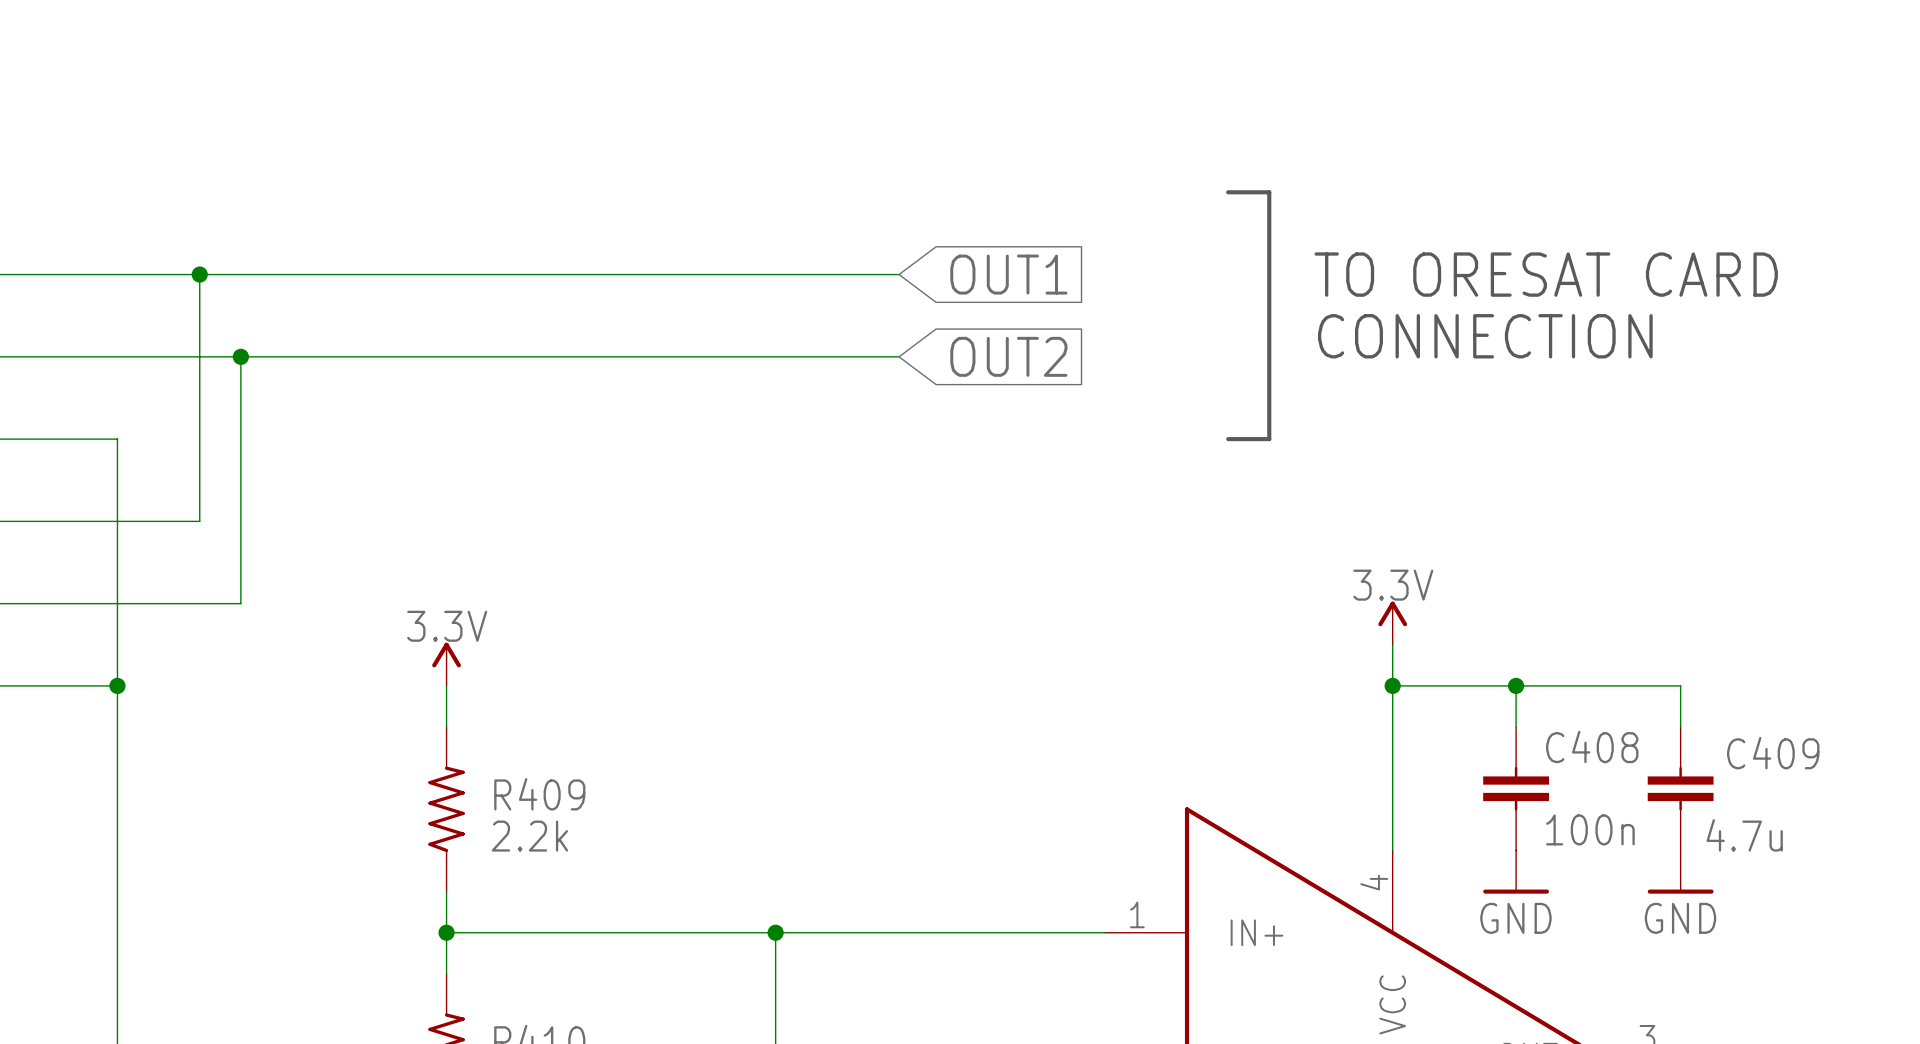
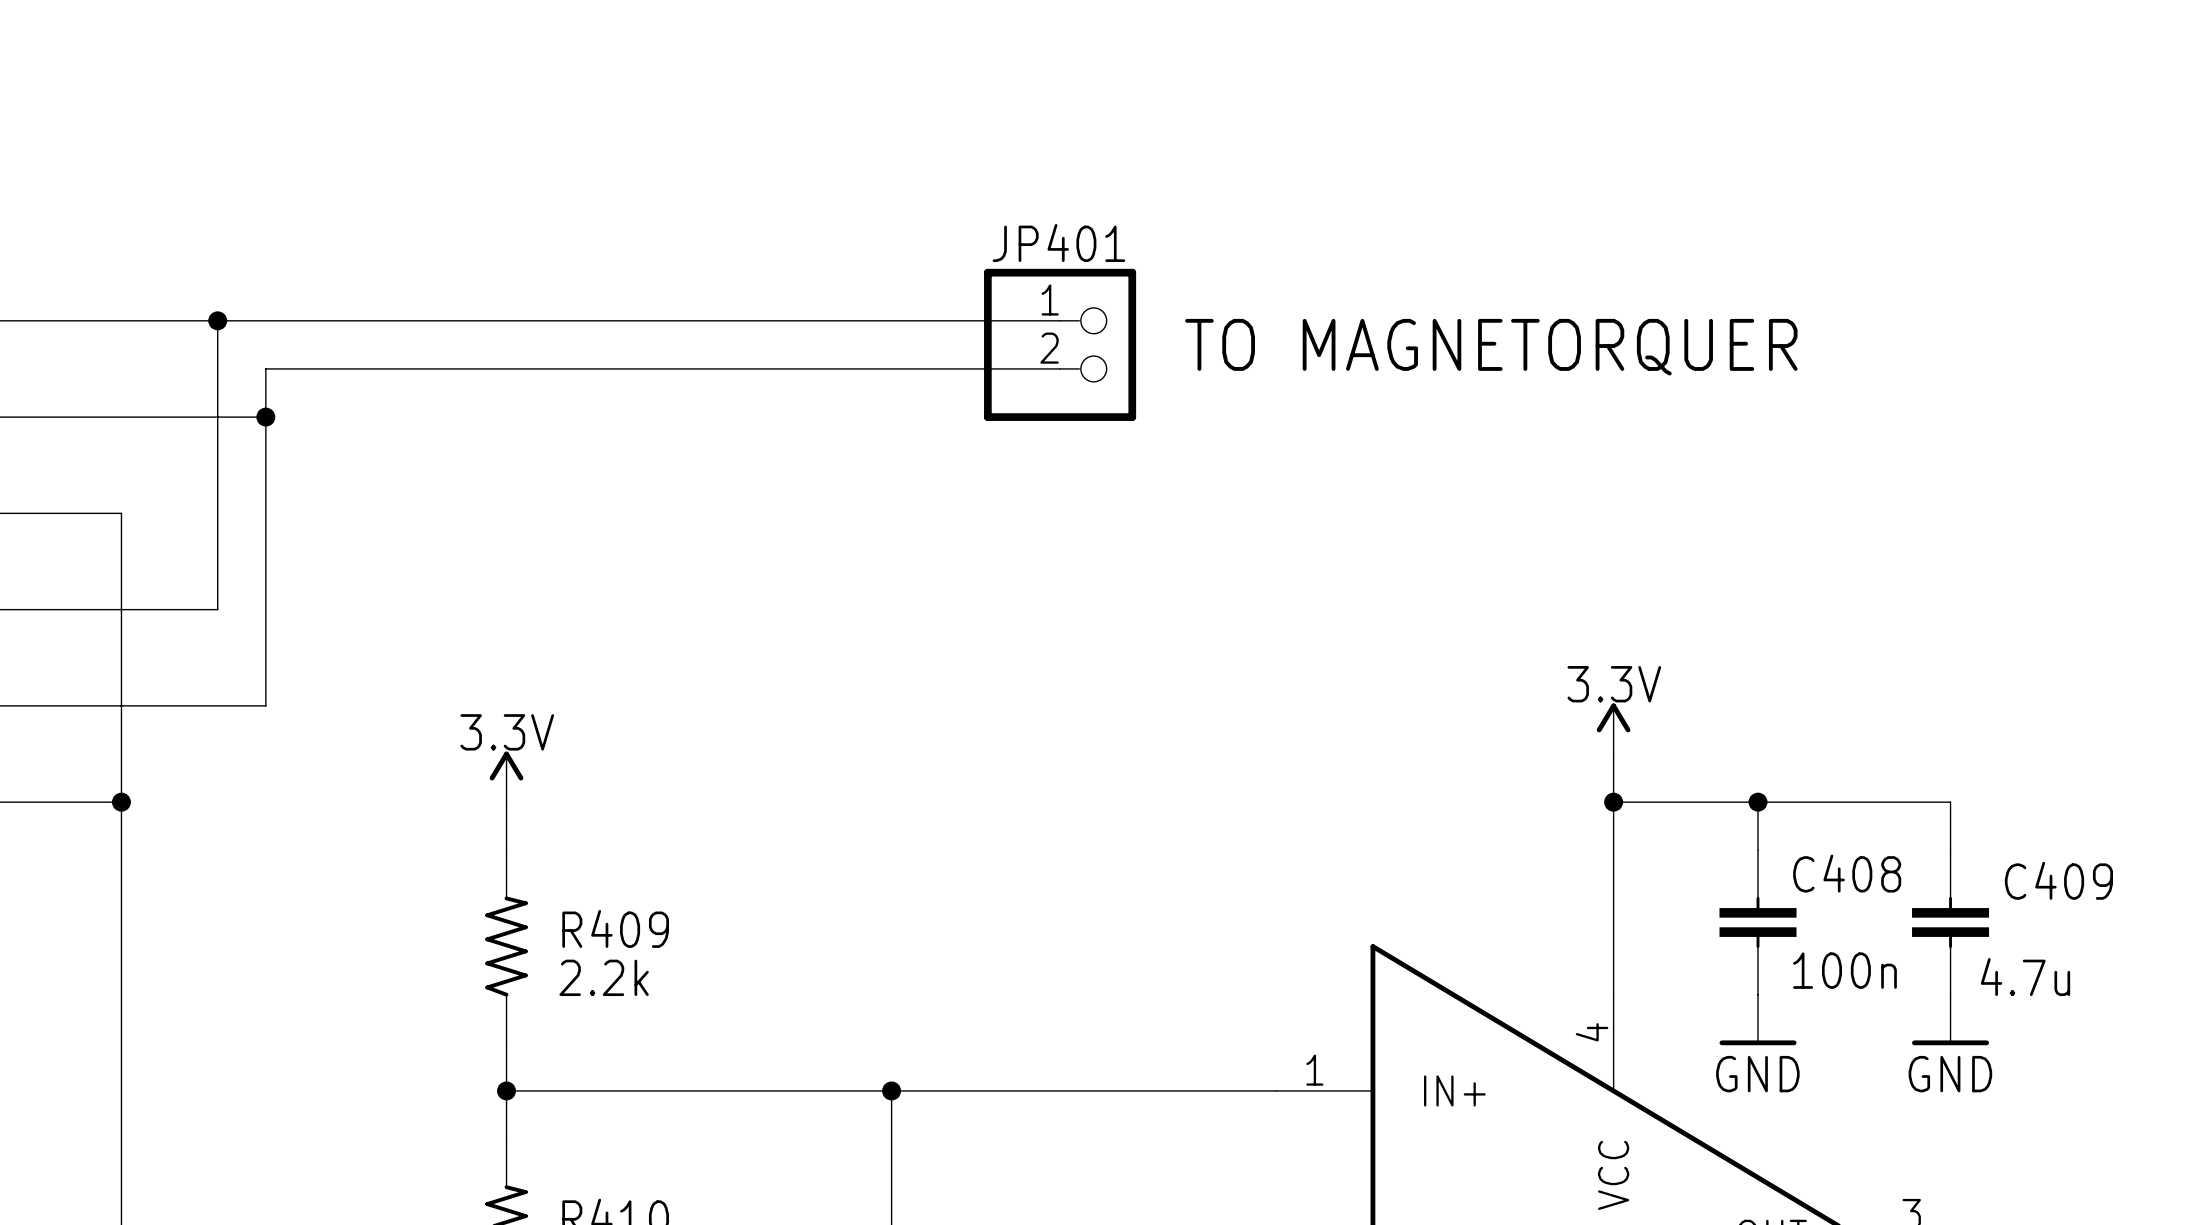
line: (1228, 192) (1269, 192) (1269, 439) (1228, 439) -> none
wire: none -> (1036, 320) (1060, 320)
global label: OUT1 (1008, 274) -> none
text: TO ORESAT CARD (1546, 274) -> none
JP401: none -> (1060, 344)
text: none -> TO MAGNETORQUER (1491, 347)
text: CONNECTION (1485, 336) -> none
wire: (240, 356) (899, 356) -> (265, 417) (265, 368) (1060, 368)
global label: OUT2 (1008, 356) -> none

